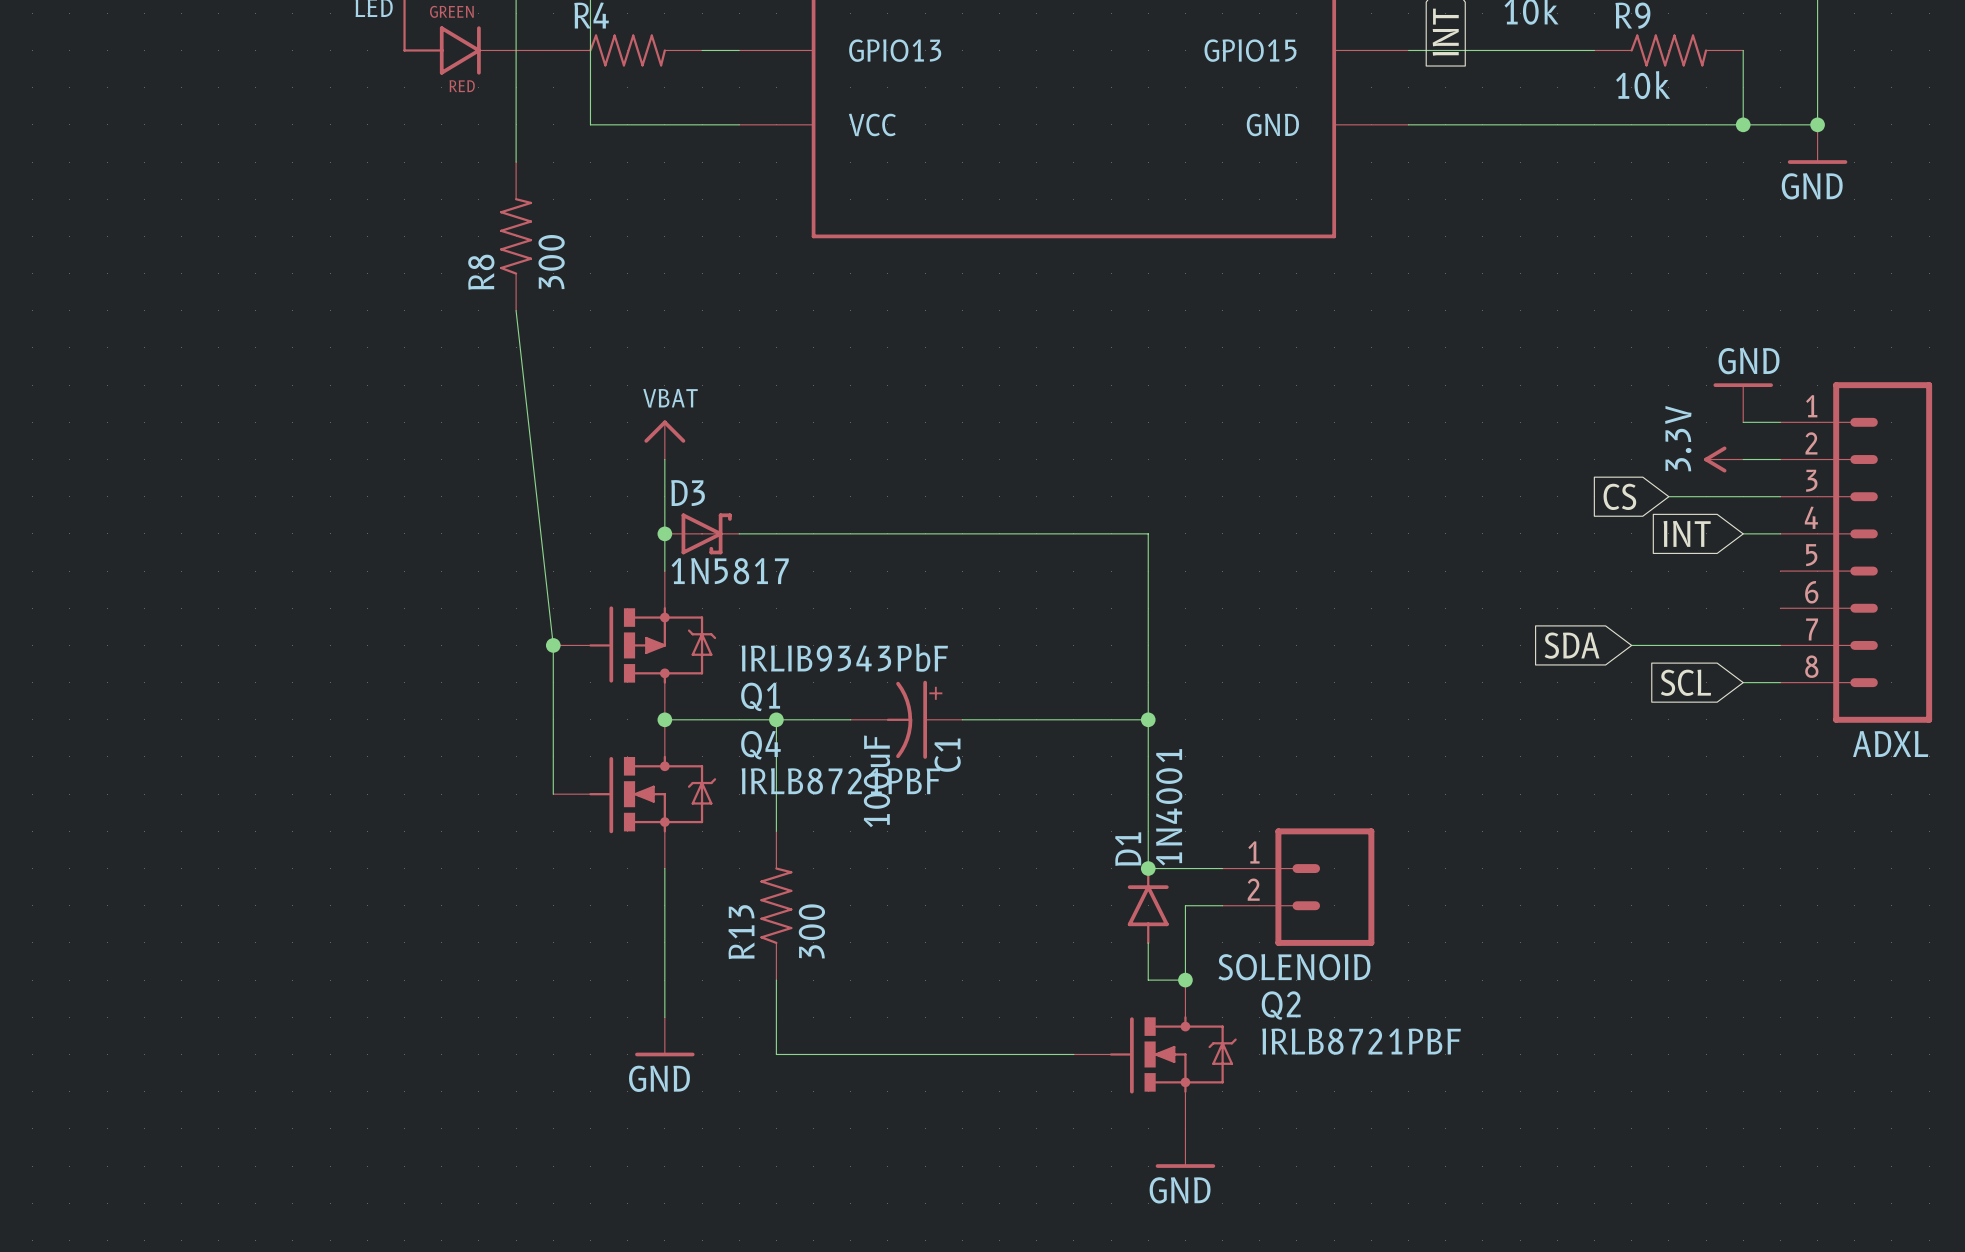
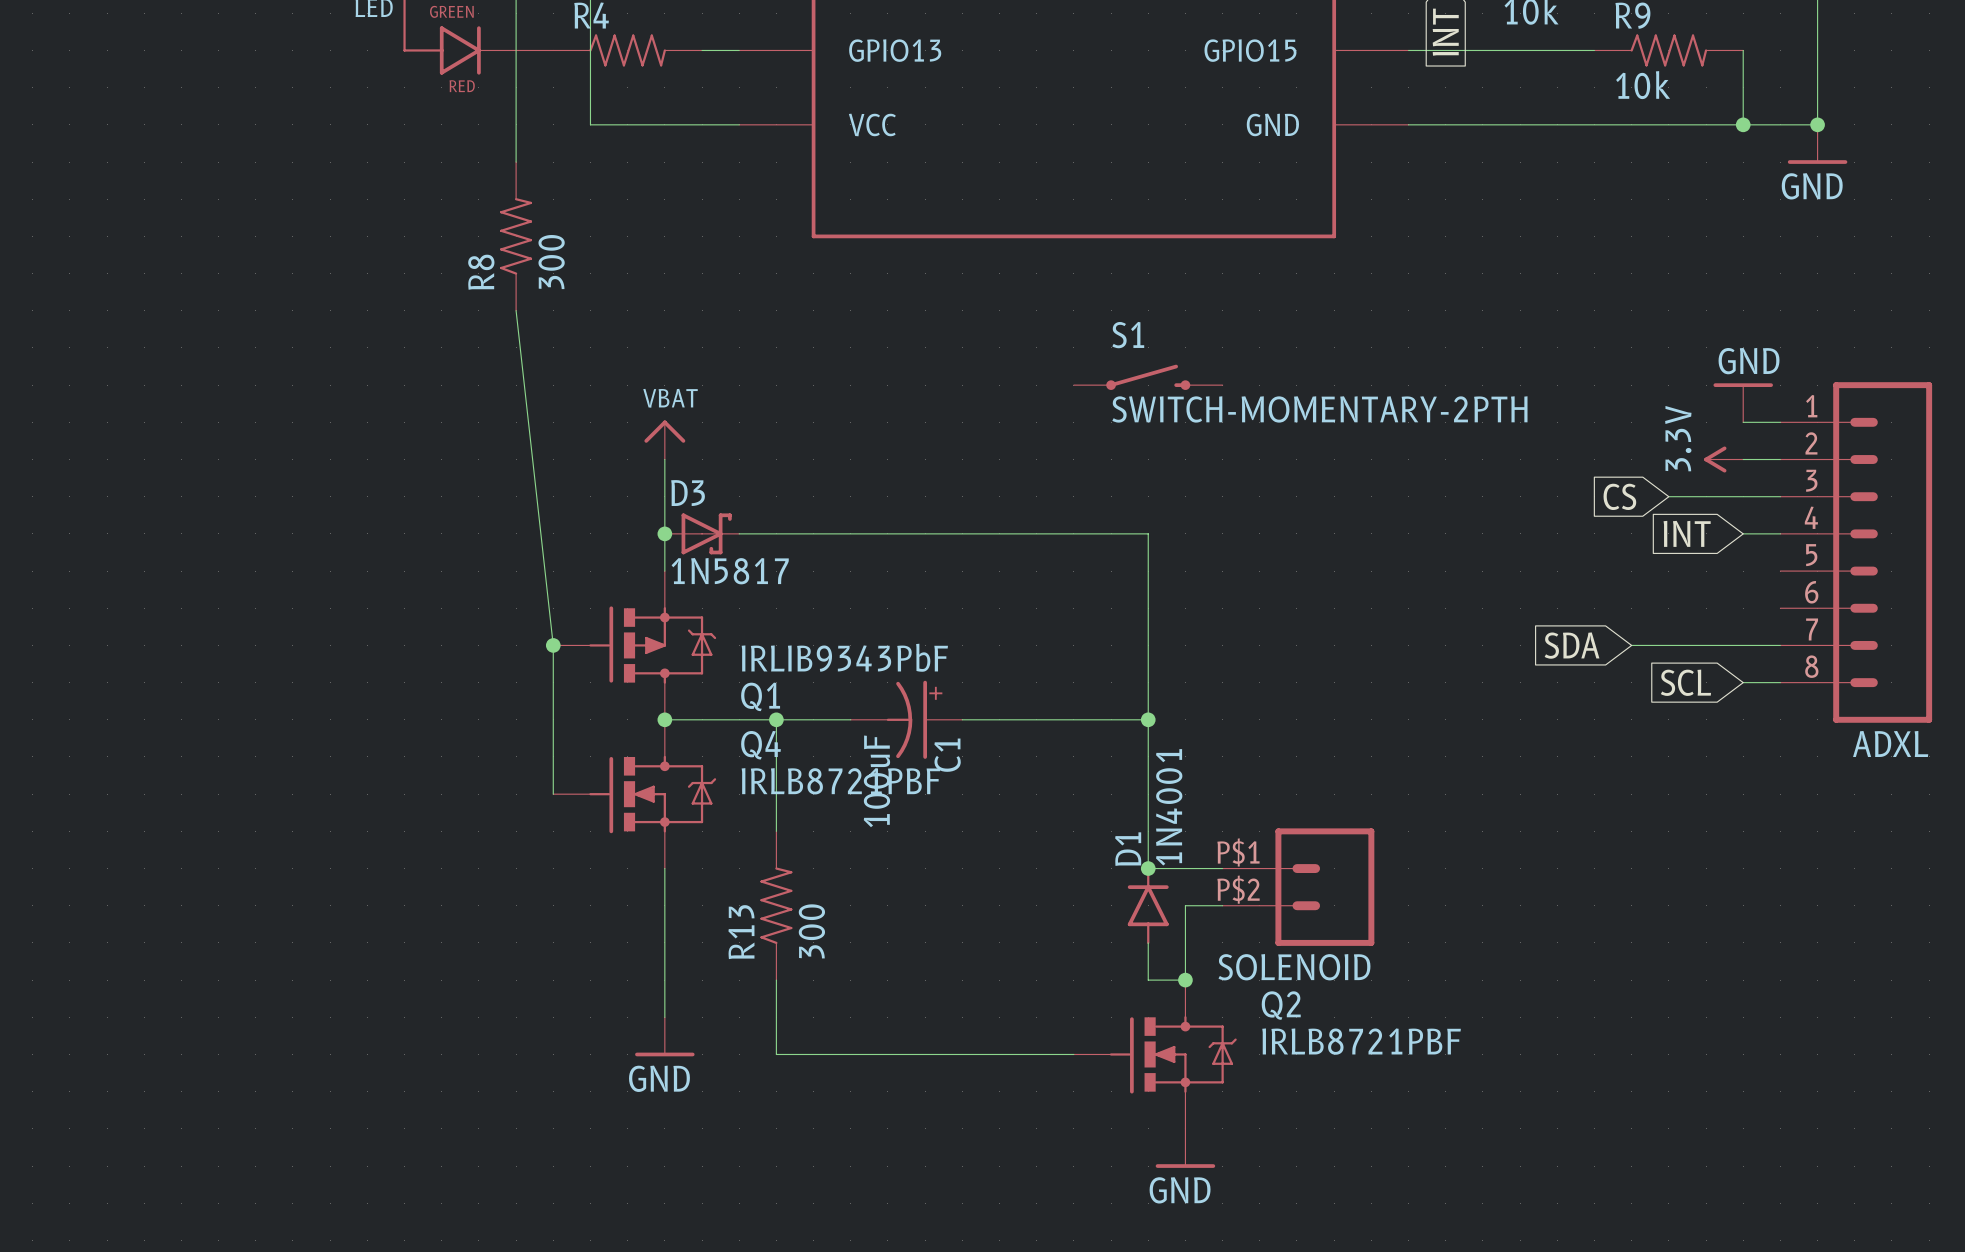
S1: none -> SWITCH-MOMENTARY-2PTH (1148, 377)
SOLENOID pin number: 1 (1253, 852) -> P$1 (1238, 852)
SOLENOID pin number: 2 (1253, 889) -> P$2 (1238, 889)

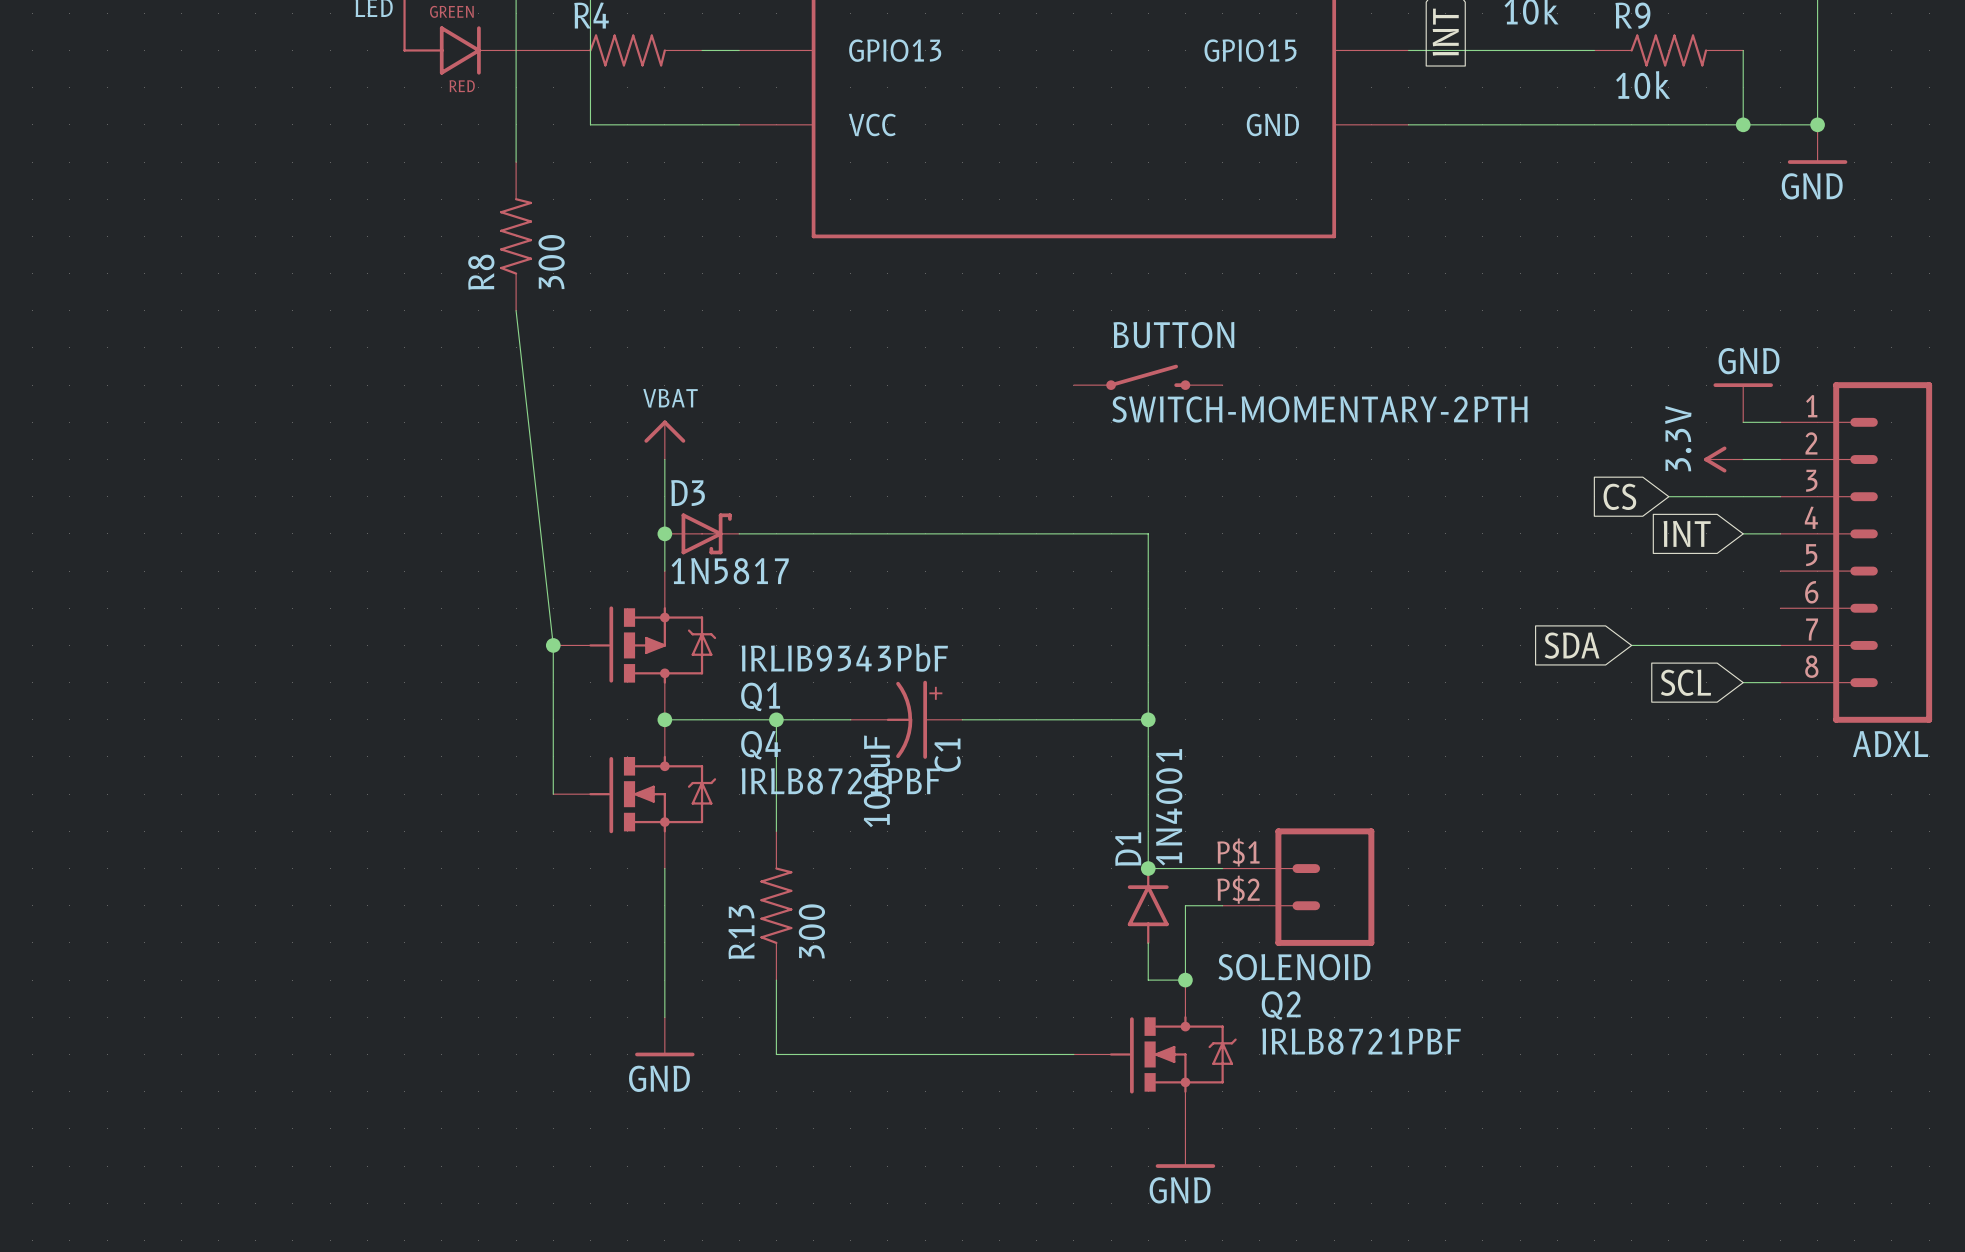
S1 name: S1 (1128, 335) -> BUTTON (1173, 335)

